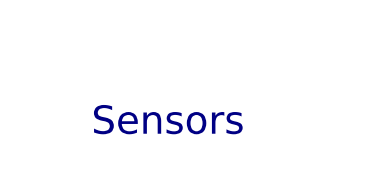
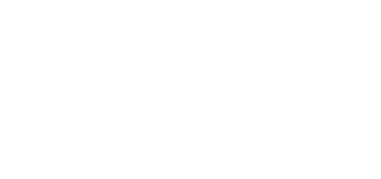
text: Sensors (168, 119) -> none

